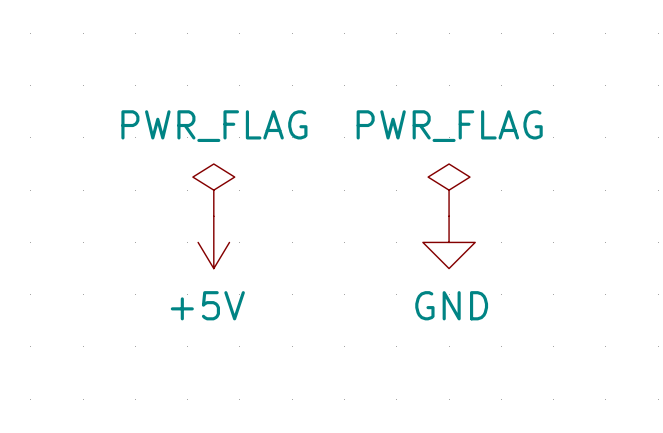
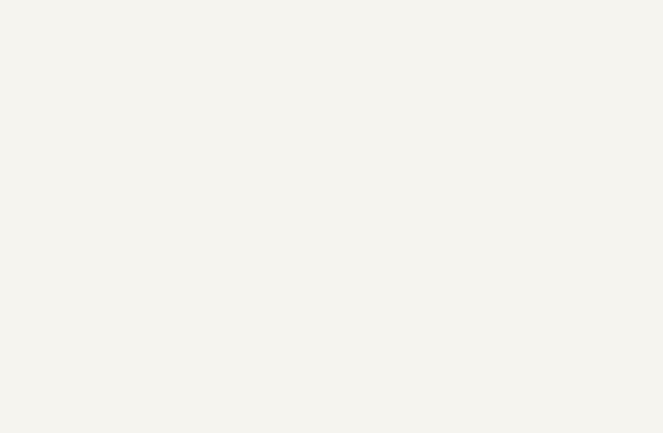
power symbol: PWR_FLAG (213, 190) -> none
power symbol: PWR_FLAG (449, 190) -> none
power symbol: +5V (213, 242) -> none
power symbol: GND (449, 242) -> none

